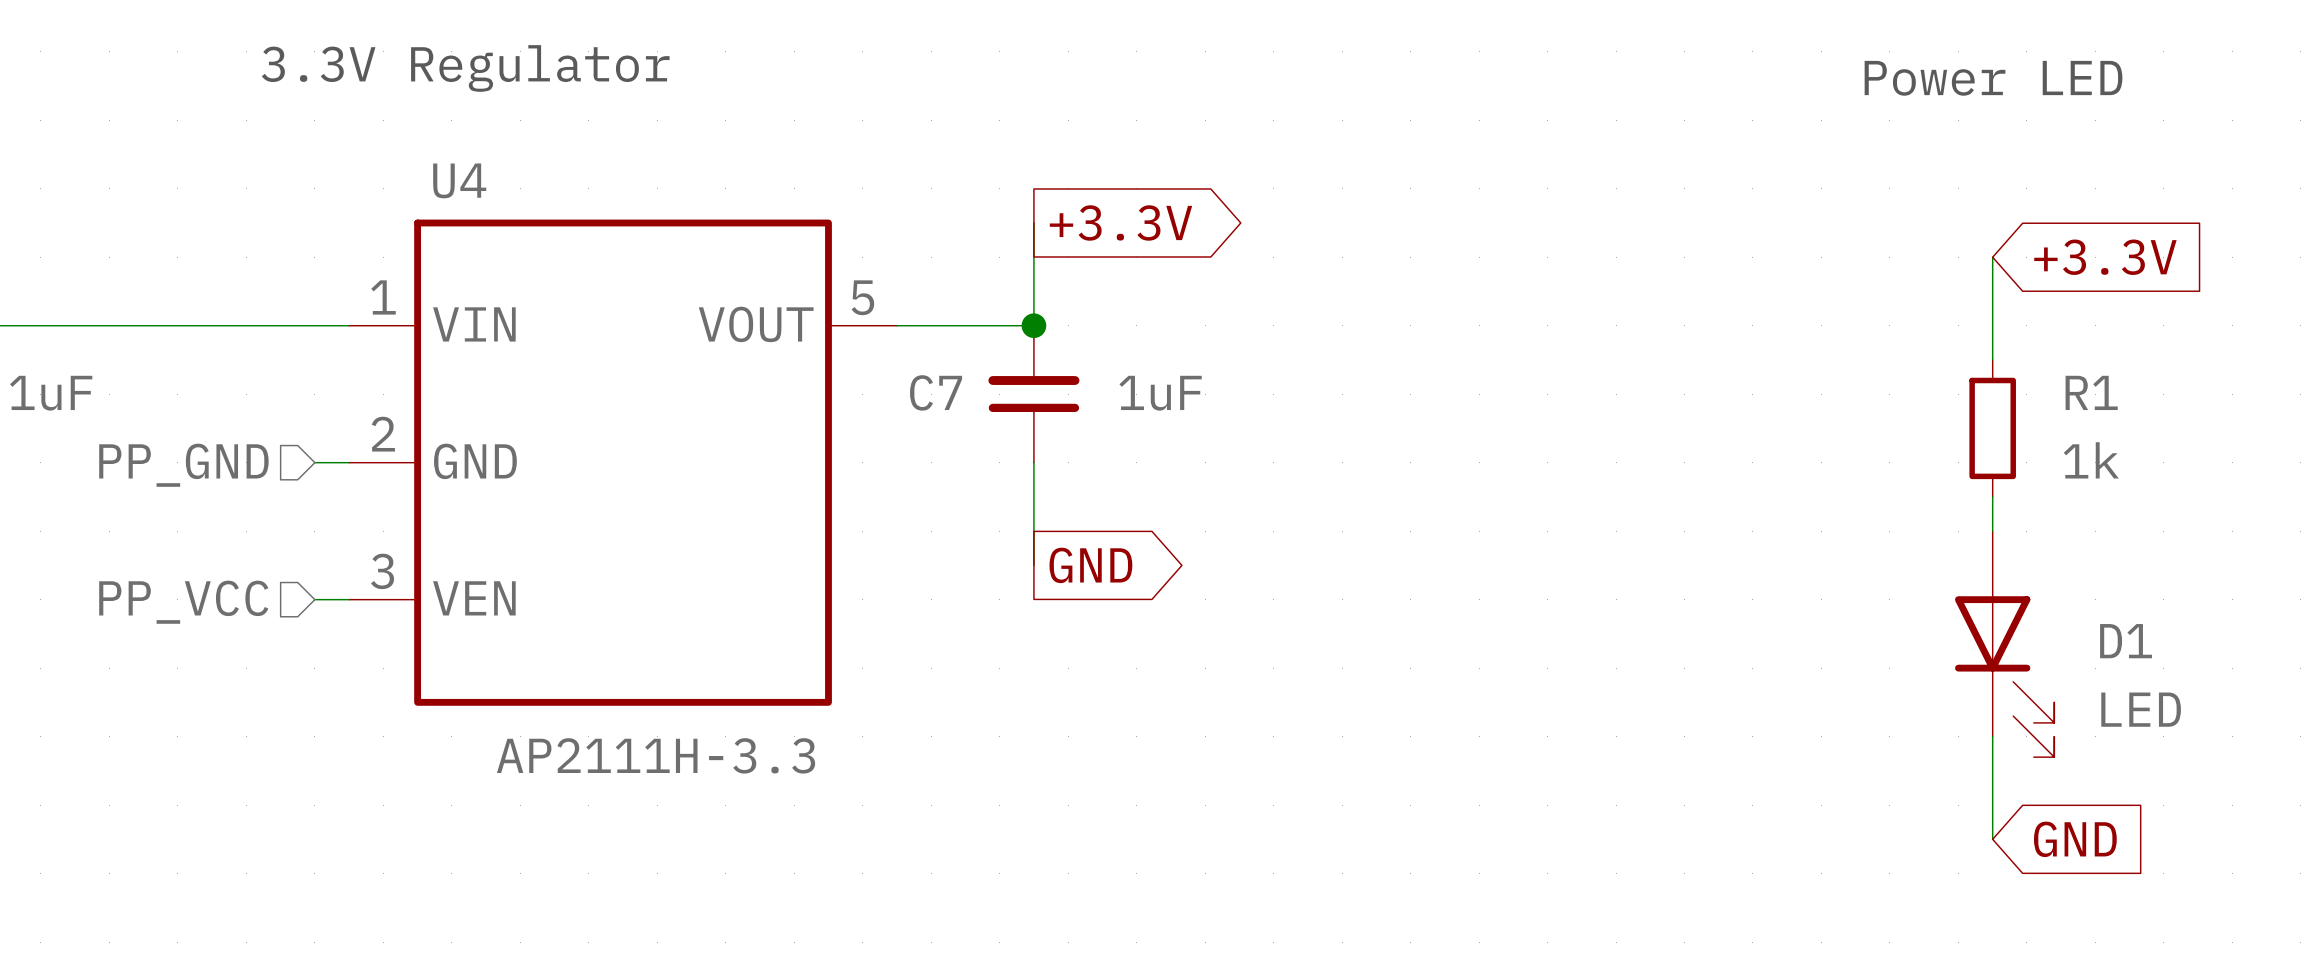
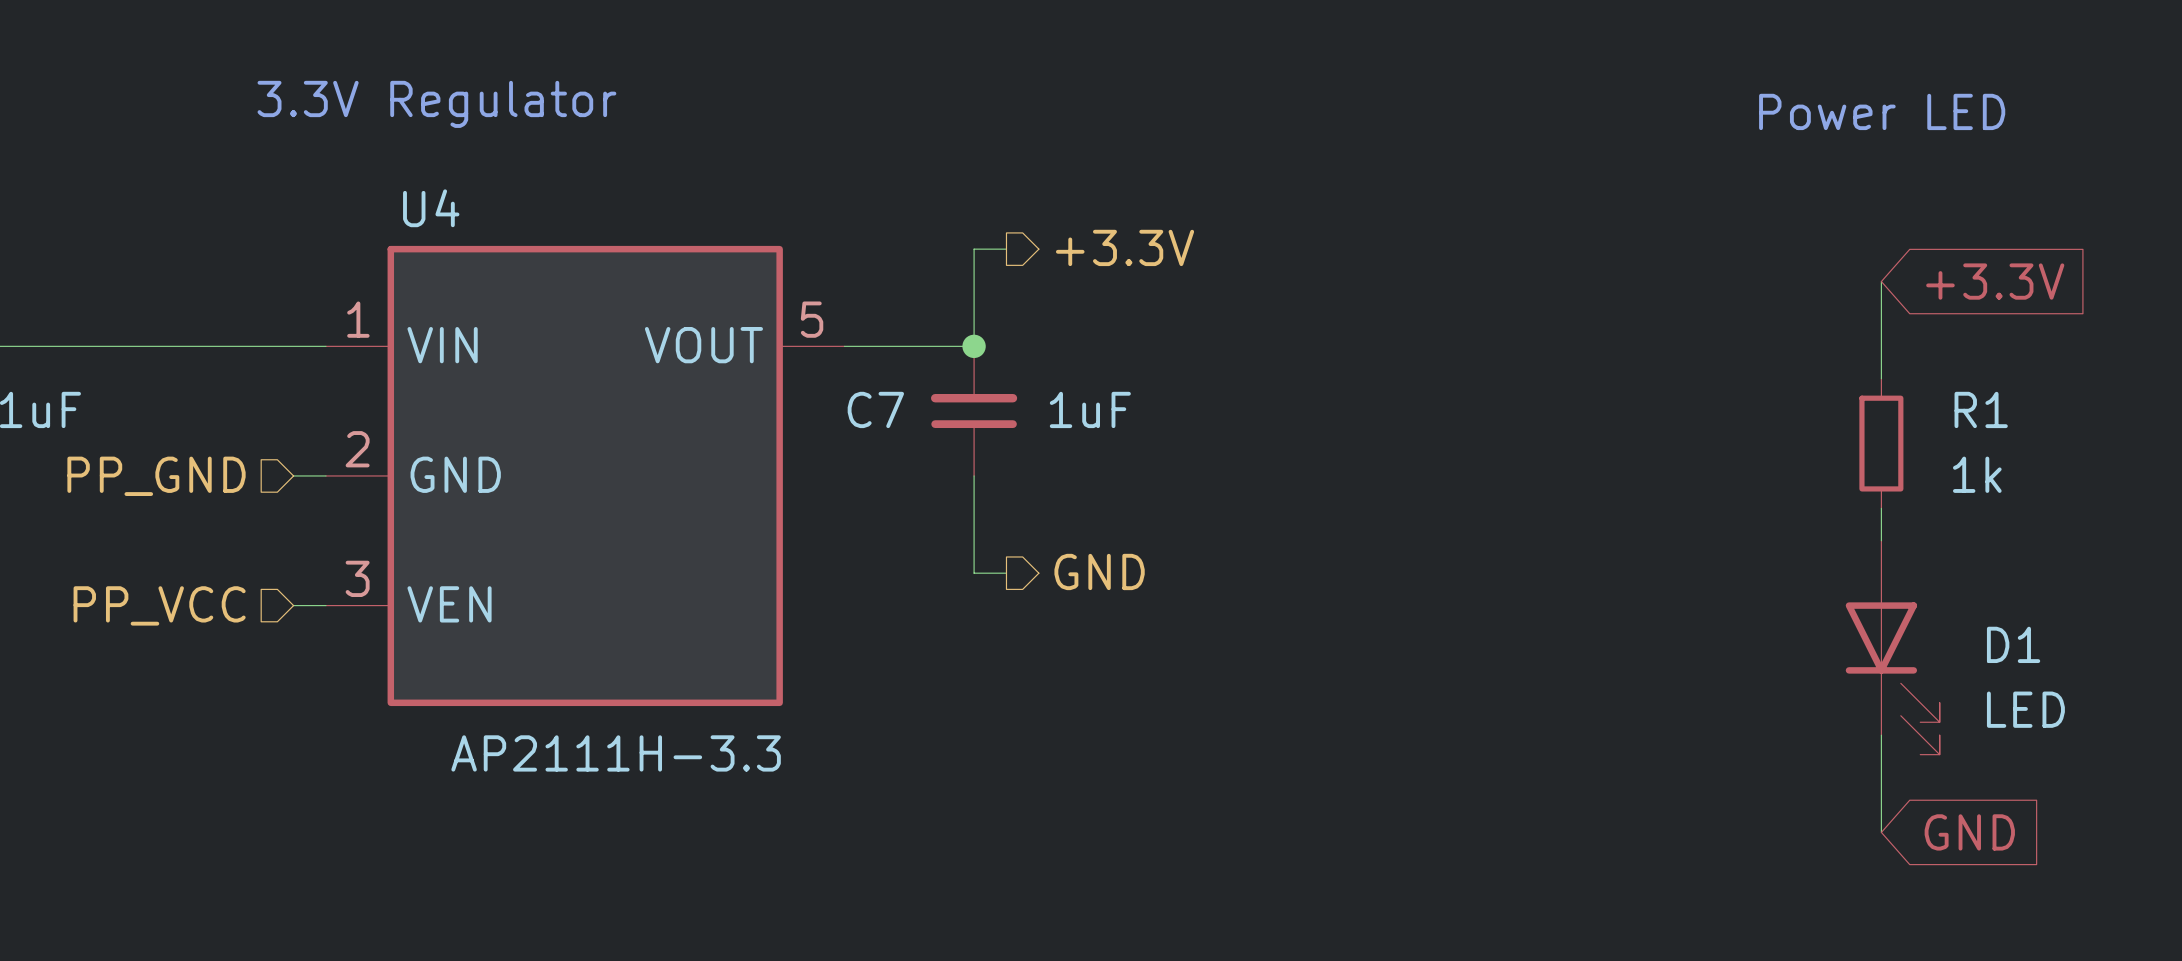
hierarchical label: none -> +3.3V (1125, 247)
wire: none -> (974, 249) (1006, 249)
global label: +3.3V (1121, 222) -> none
hierarchical label: none -> GND (1099, 571)
wire: none -> (974, 573) (1006, 573)
global label: GND (1090, 565) -> none

